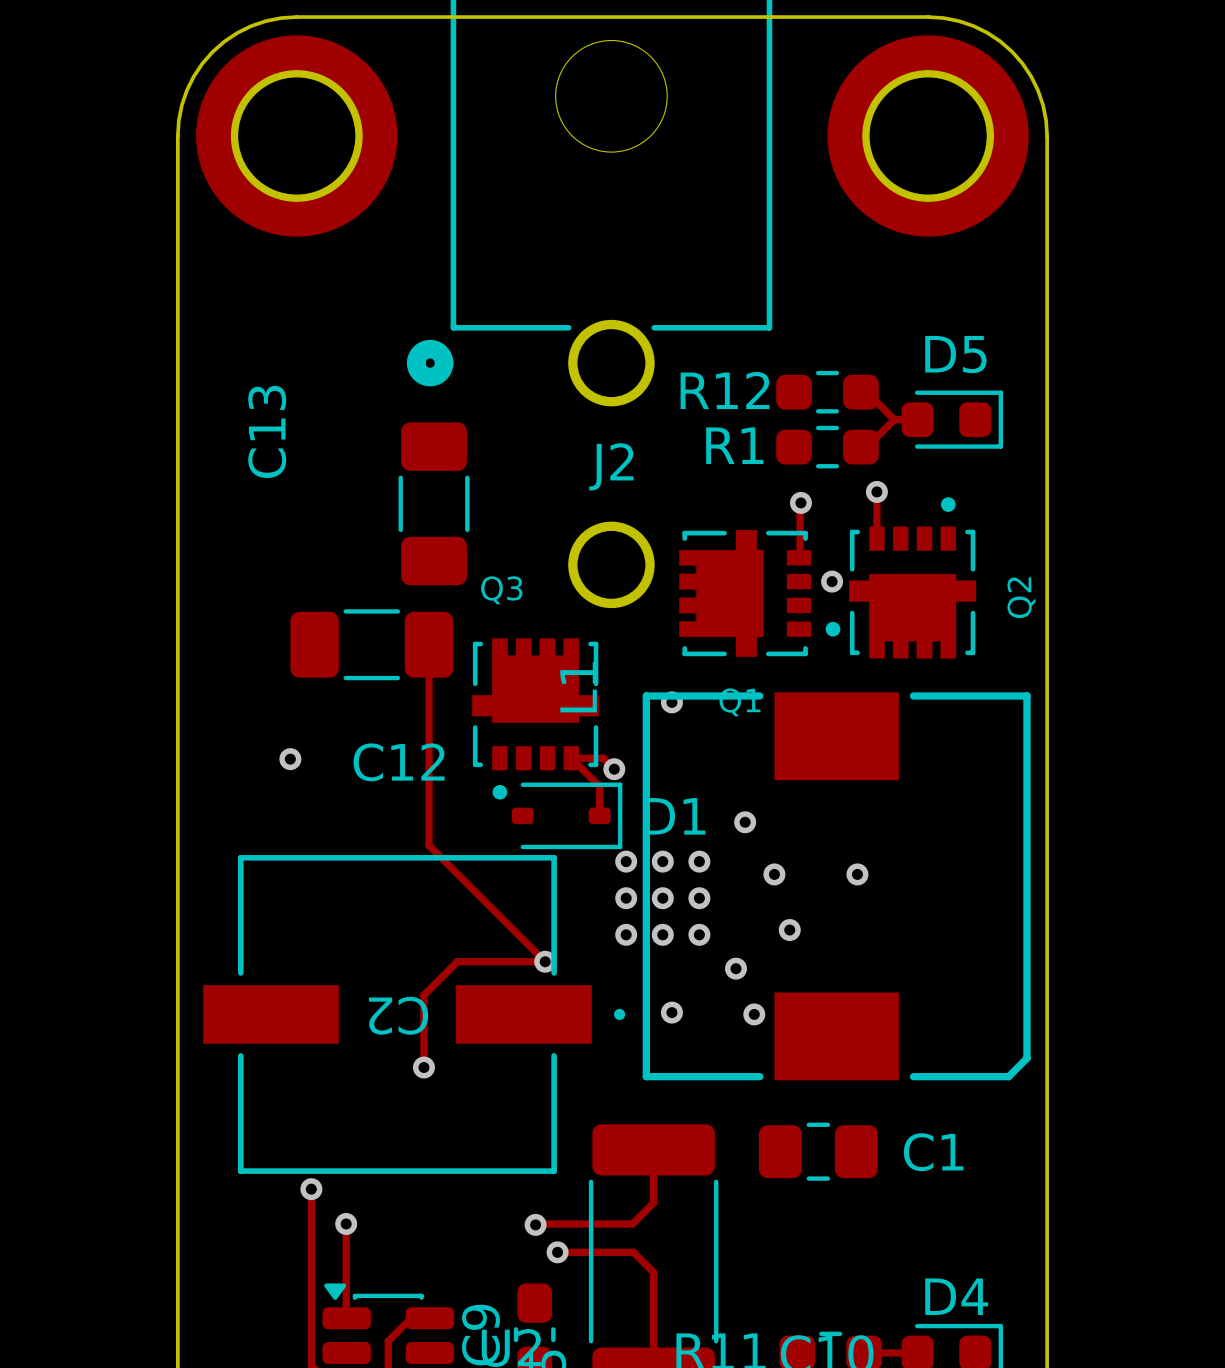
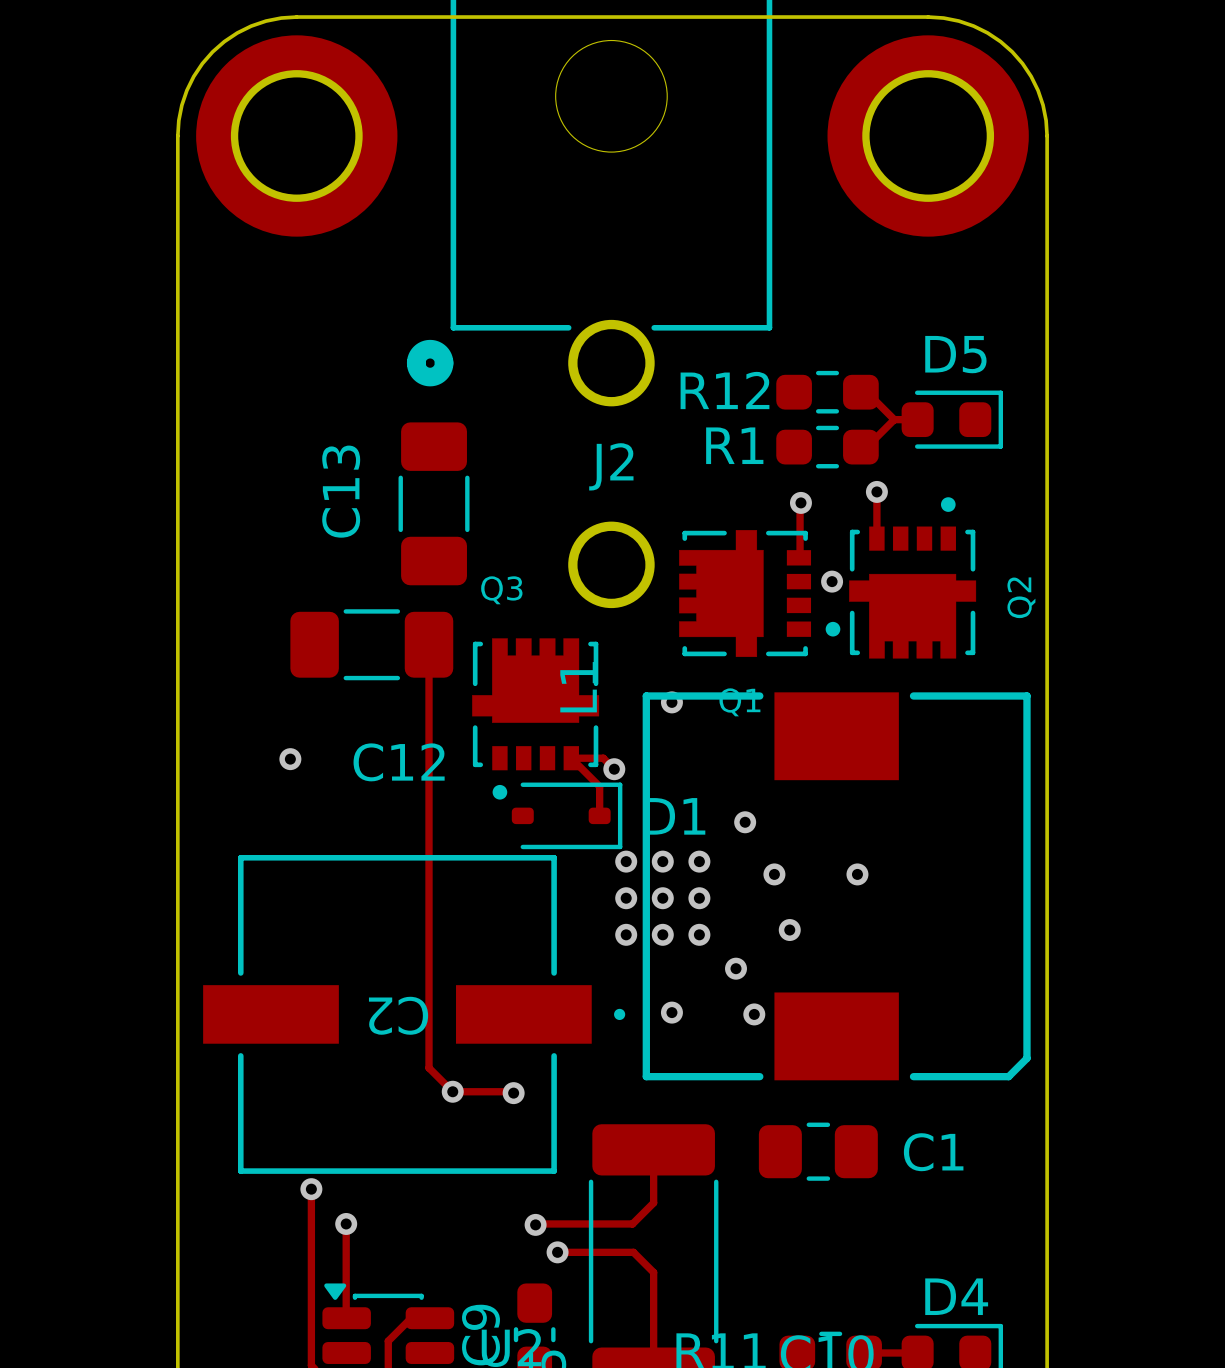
C13 name position: C13 (267, 431) -> C13 (341, 491)
track: (429, 845) (545, 961) (457, 961) (423, 995) (423, 1067) -> (429, 845) (429, 1067) (452, 1091) (513, 1093)
via: (545, 961) -> none
via position: (423, 1067) -> (452, 1091)
via: none -> (513, 1093)

